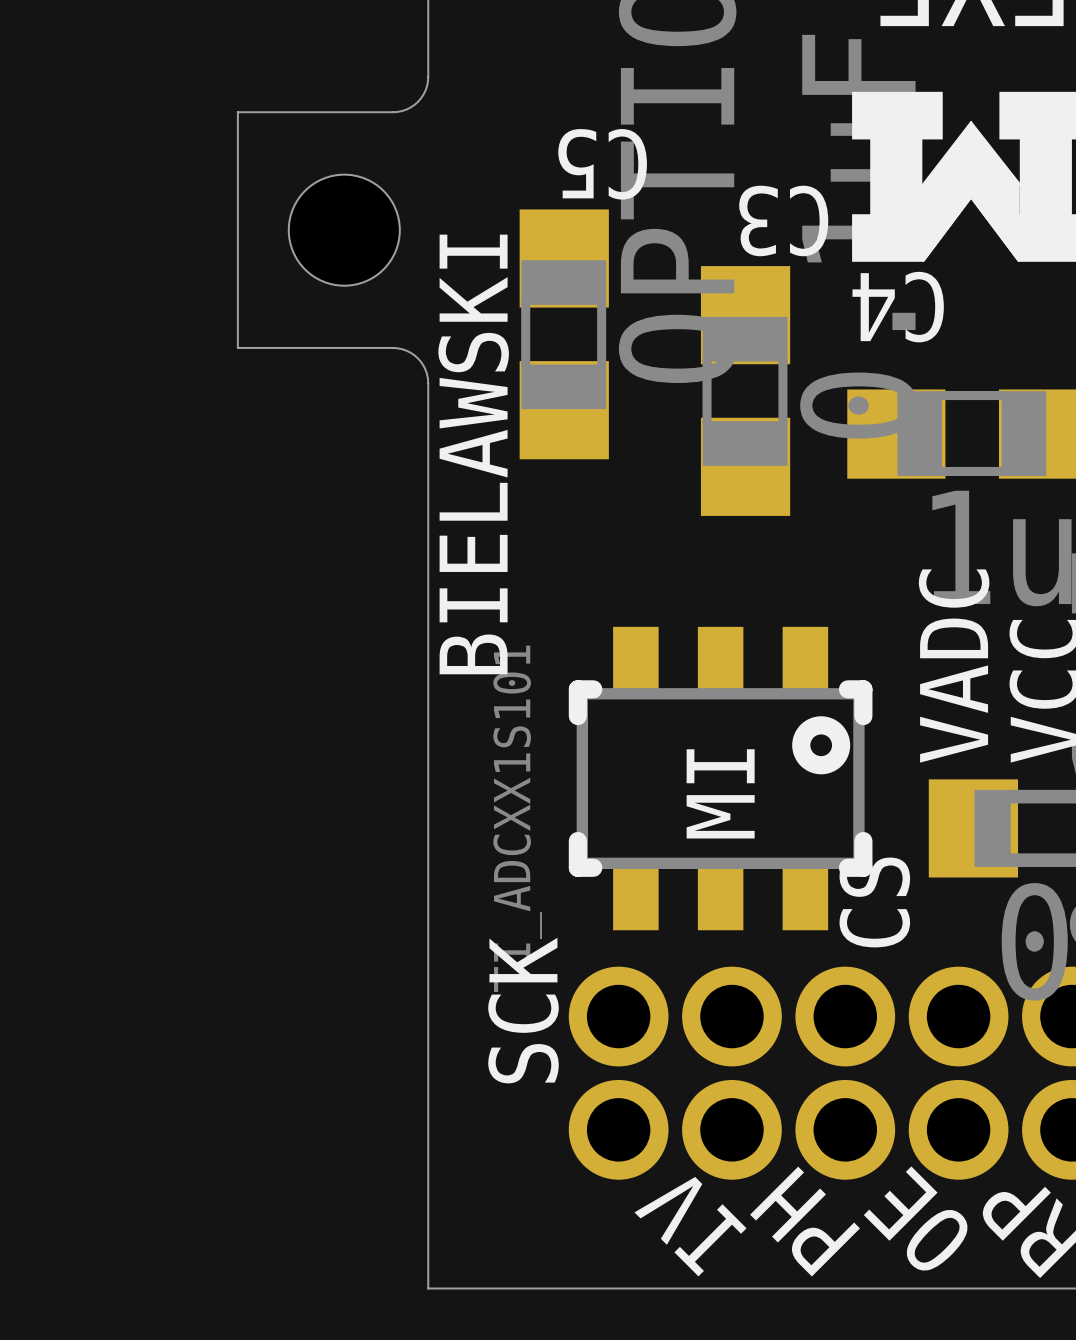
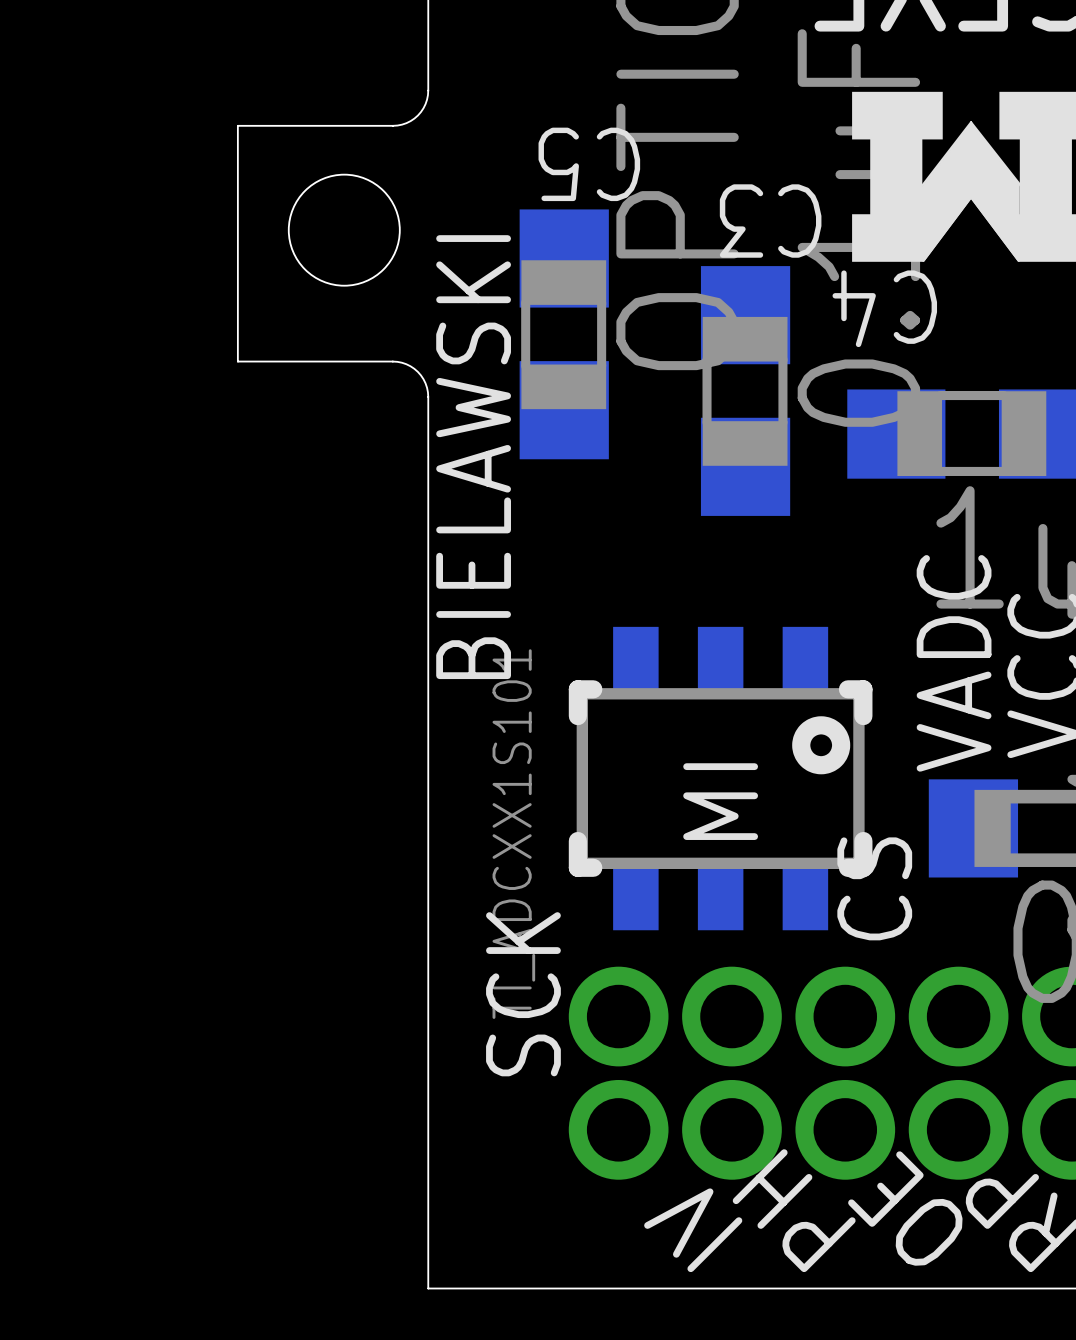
board edge: (428, 76) (425, 90) (420, 98) (410, 107) (402, 111) (237, 112) (237, 125) -> (428, 76) (427, 95) (423, 108) (414, 118) (402, 124) (237, 125)
board edge: (237, 347) (402, 349) (414, 355) (423, 365) (427, 378) (428, 396) -> (237, 347) (237, 361) (402, 362) (414, 368) (420, 375) (427, 387) (428, 396)
text position: BIELAWSKI (473, 454) -> BIELAWSKI (473, 457)
text position: VADC (954, 666) -> VADC (954, 663)
text position: MI (720, 793) -> MI (720, 801)

